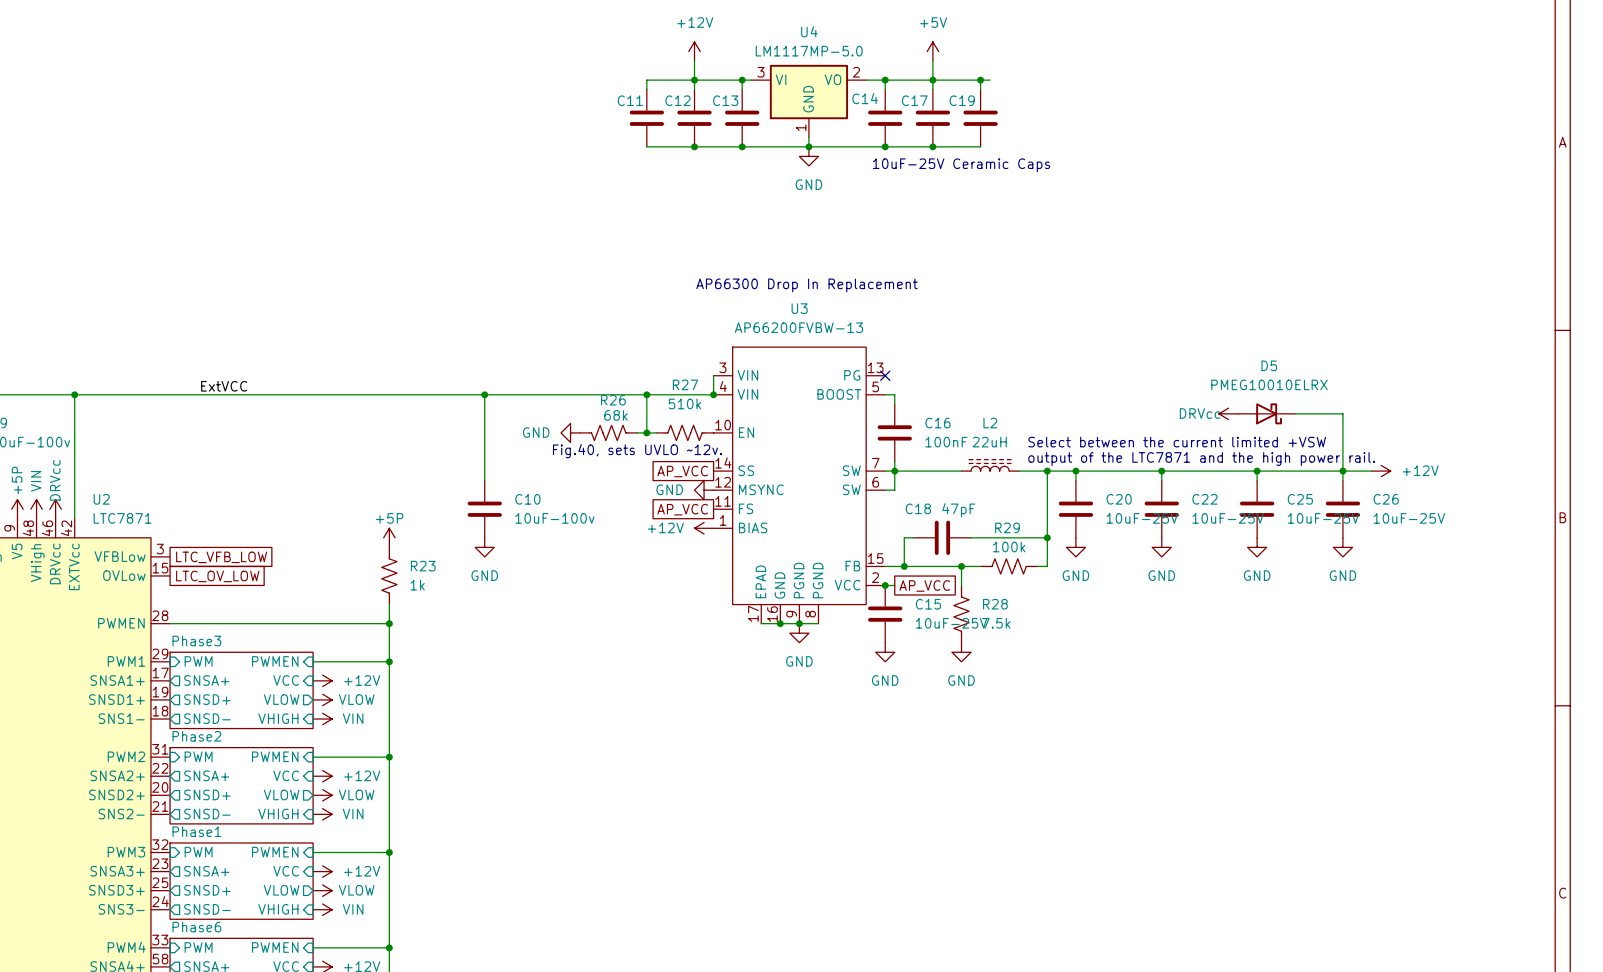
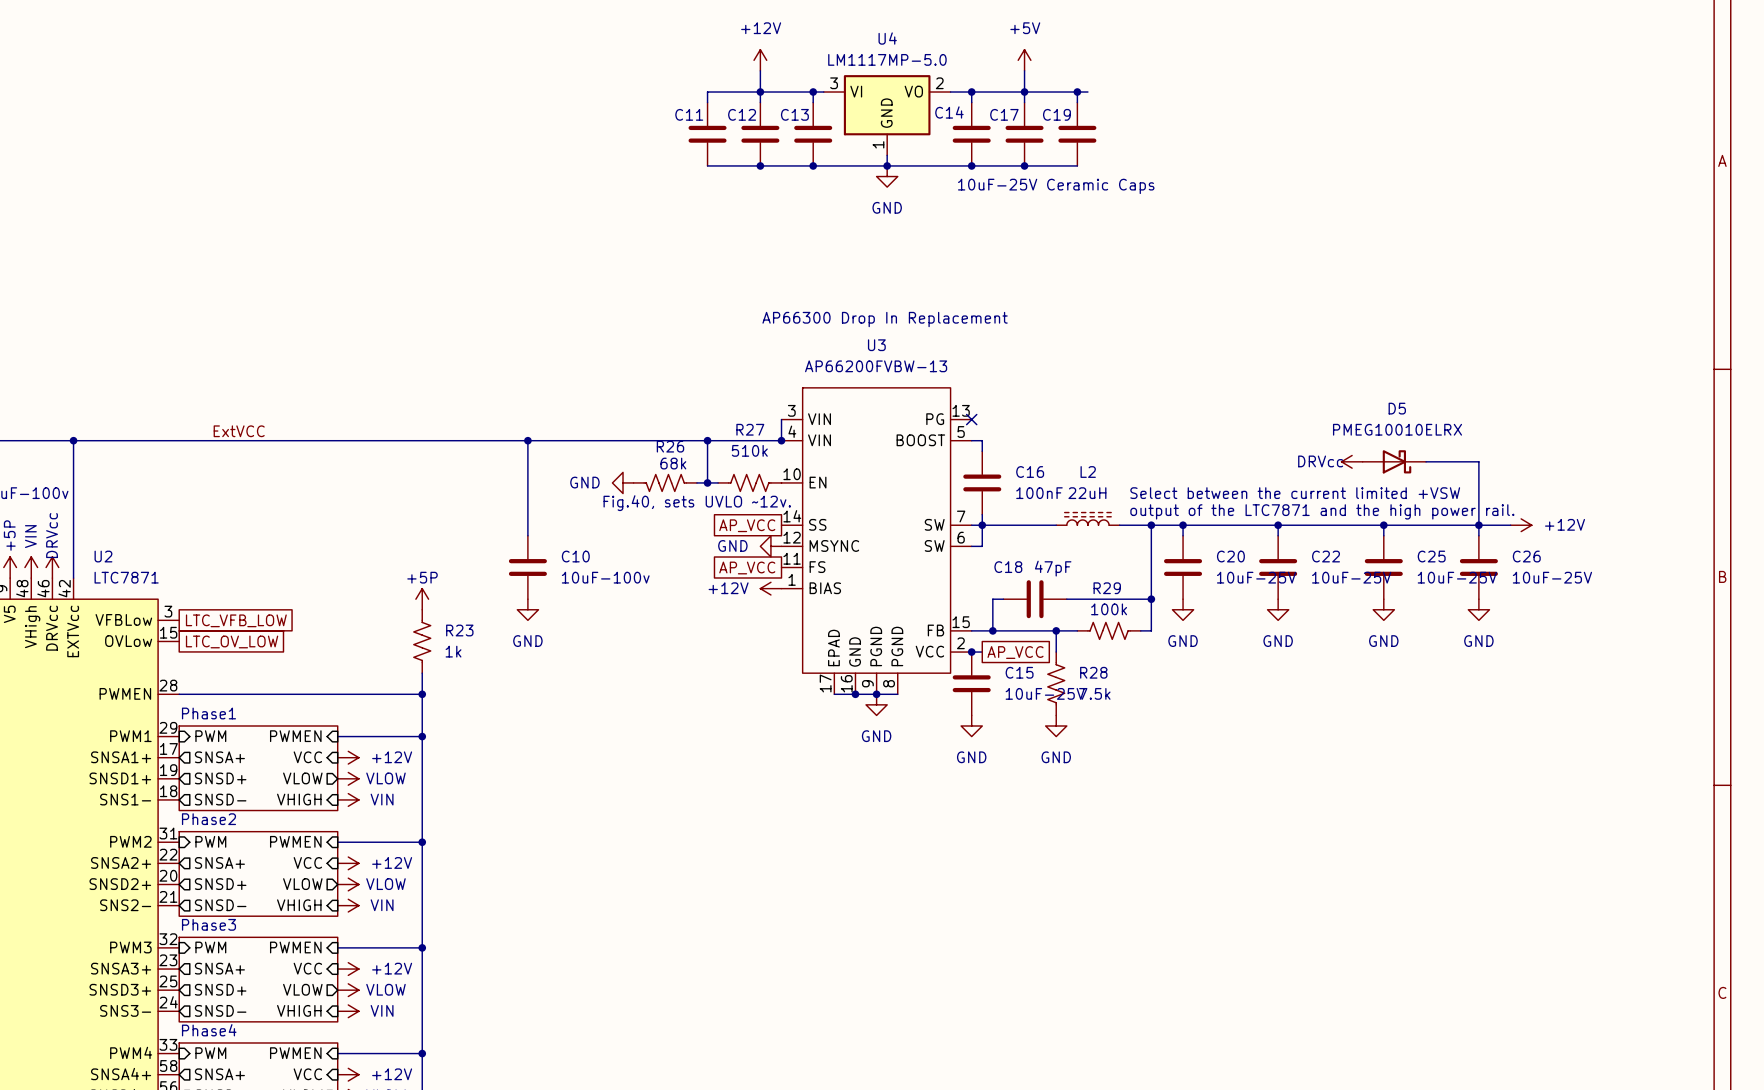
sheet Phase3 name: Phase3 (196, 640) -> Phase1 (208, 713)
sheet Phase1 name: Phase1 (196, 831) -> Phase3 (208, 924)
sheet Phase6 name: Phase6 (196, 927) -> Phase4 (209, 1030)

